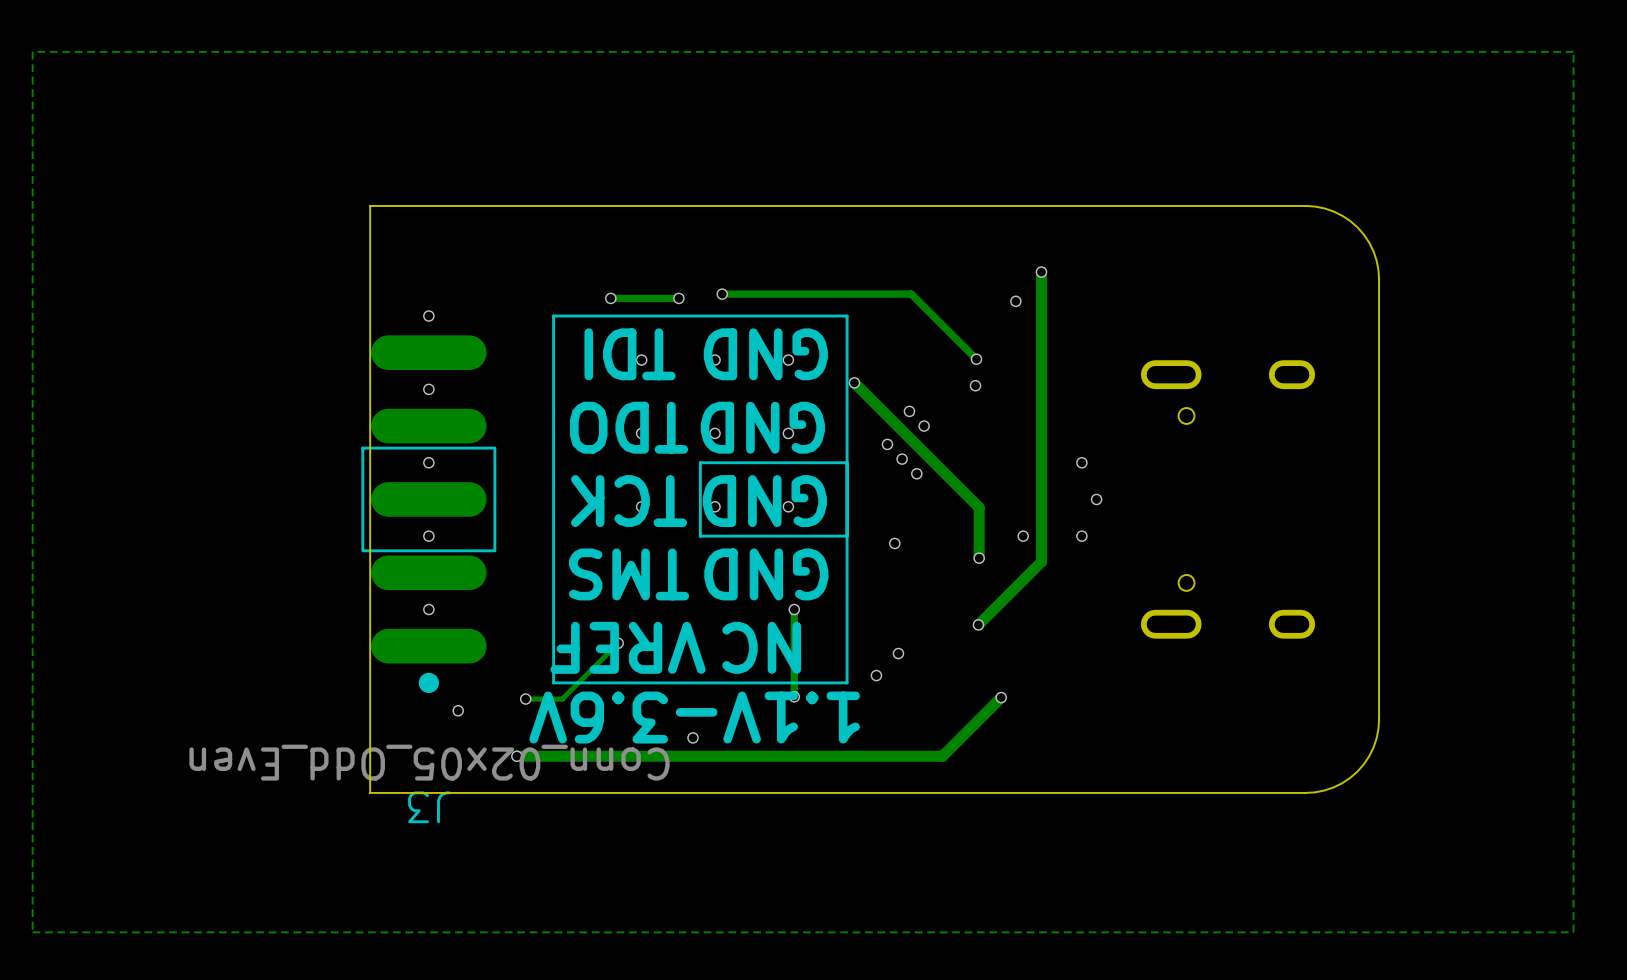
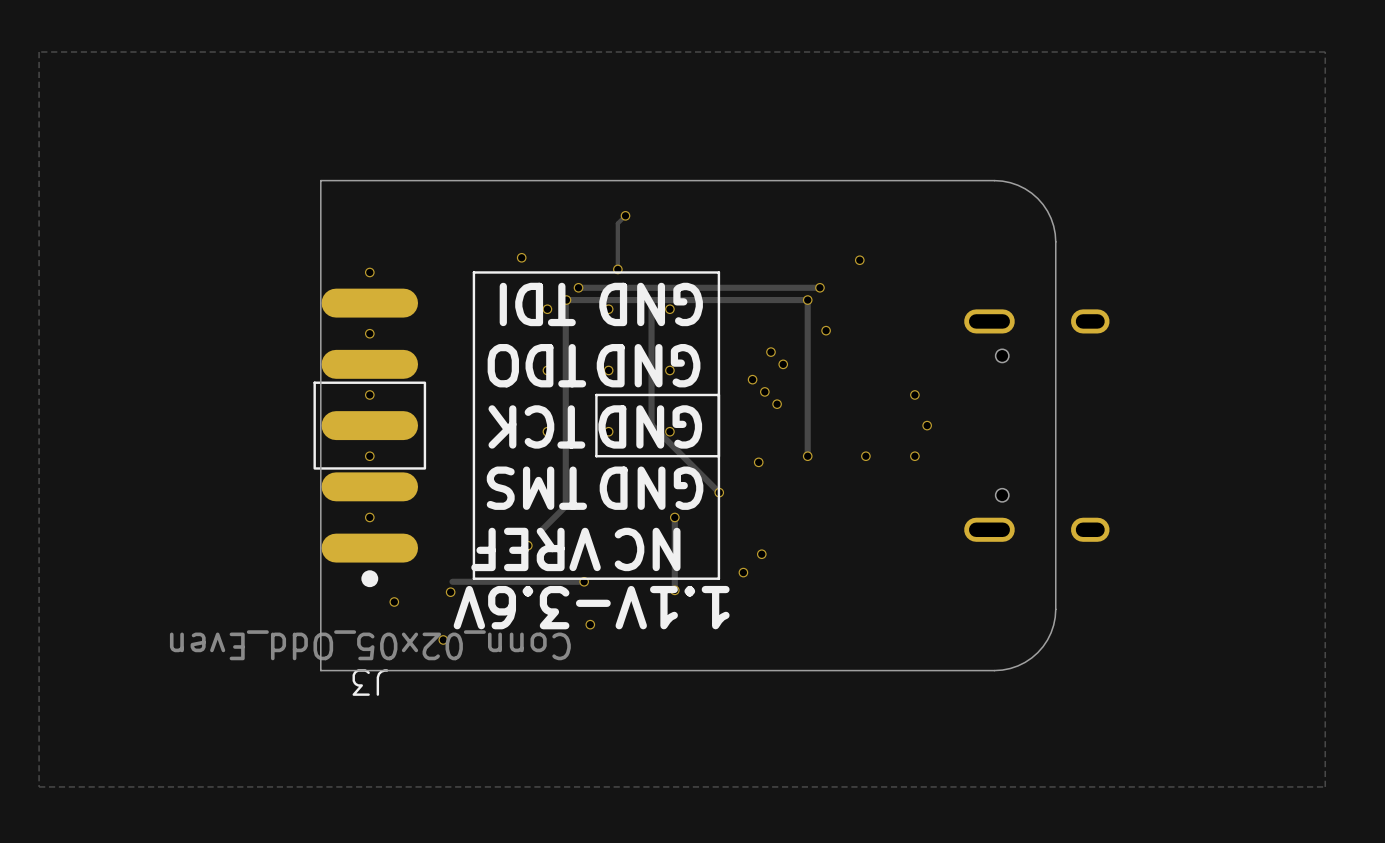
board edge: (1177, 205) (1305, 205) (1333, 211) (1357, 227) (1369, 242) (1376, 260) (1379, 279) (1379, 719) (1373, 747) (1357, 771) (1342, 783) (1324, 790) (1305, 792) (1177, 792) -> (994, 180) (1017, 185) (1037, 198) (1051, 218) (1055, 241) (1055, 617) (1047, 639) (1037, 652) (1017, 665) (994, 670)
track: none -> (625, 215) (617, 223) (617, 269)
via: none -> (625, 215)
track: (1041, 272) (1041, 561) (978, 624) -> none
via: (1041, 272) -> none
track: (722, 294) (911, 294) (976, 359) -> none
via position: (722, 294) -> (617, 269)
track: (678, 298) (610, 298) -> none
via: (678, 298) -> none
via: none -> (578, 287)
track: none -> (819, 287) (578, 287)
via: none -> (819, 287)
via: none -> (566, 300)
track: none -> (650, 300) (651, 424) (719, 492)
via: none -> (807, 300)
via: (976, 359) -> none
track: (854, 382) (979, 507) (979, 558) -> none
via: (854, 382) -> none
track: none -> (807, 456) (807, 300) (566, 300) (565, 506) (542, 529)
via position: (979, 558) -> (807, 456)
via: none -> (719, 492)
via: (978, 624) -> none
track: (618, 643) (562, 699) (525, 699) -> none
track: none -> (584, 581) (452, 581)
via: none -> (584, 581)
track: (1001, 697) (942, 756) (516, 756) -> none
via: (1001, 697) -> none

